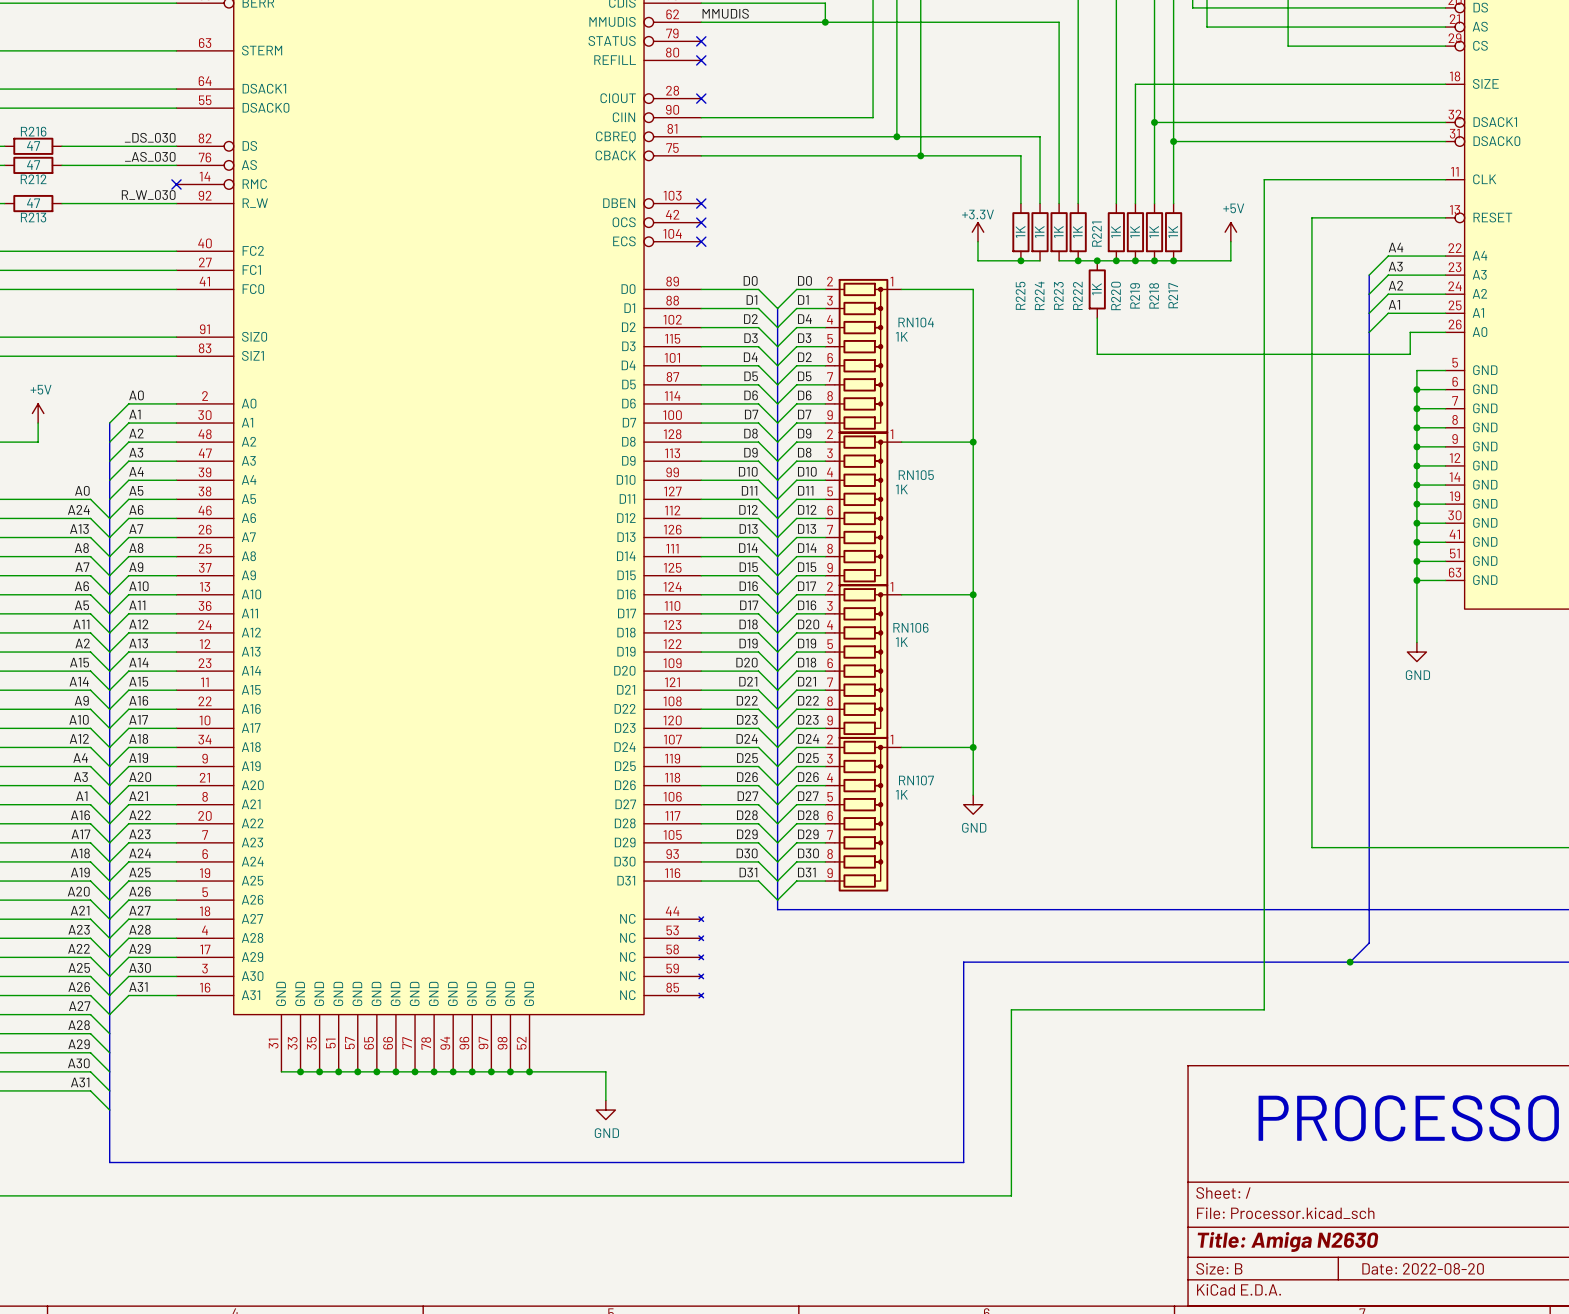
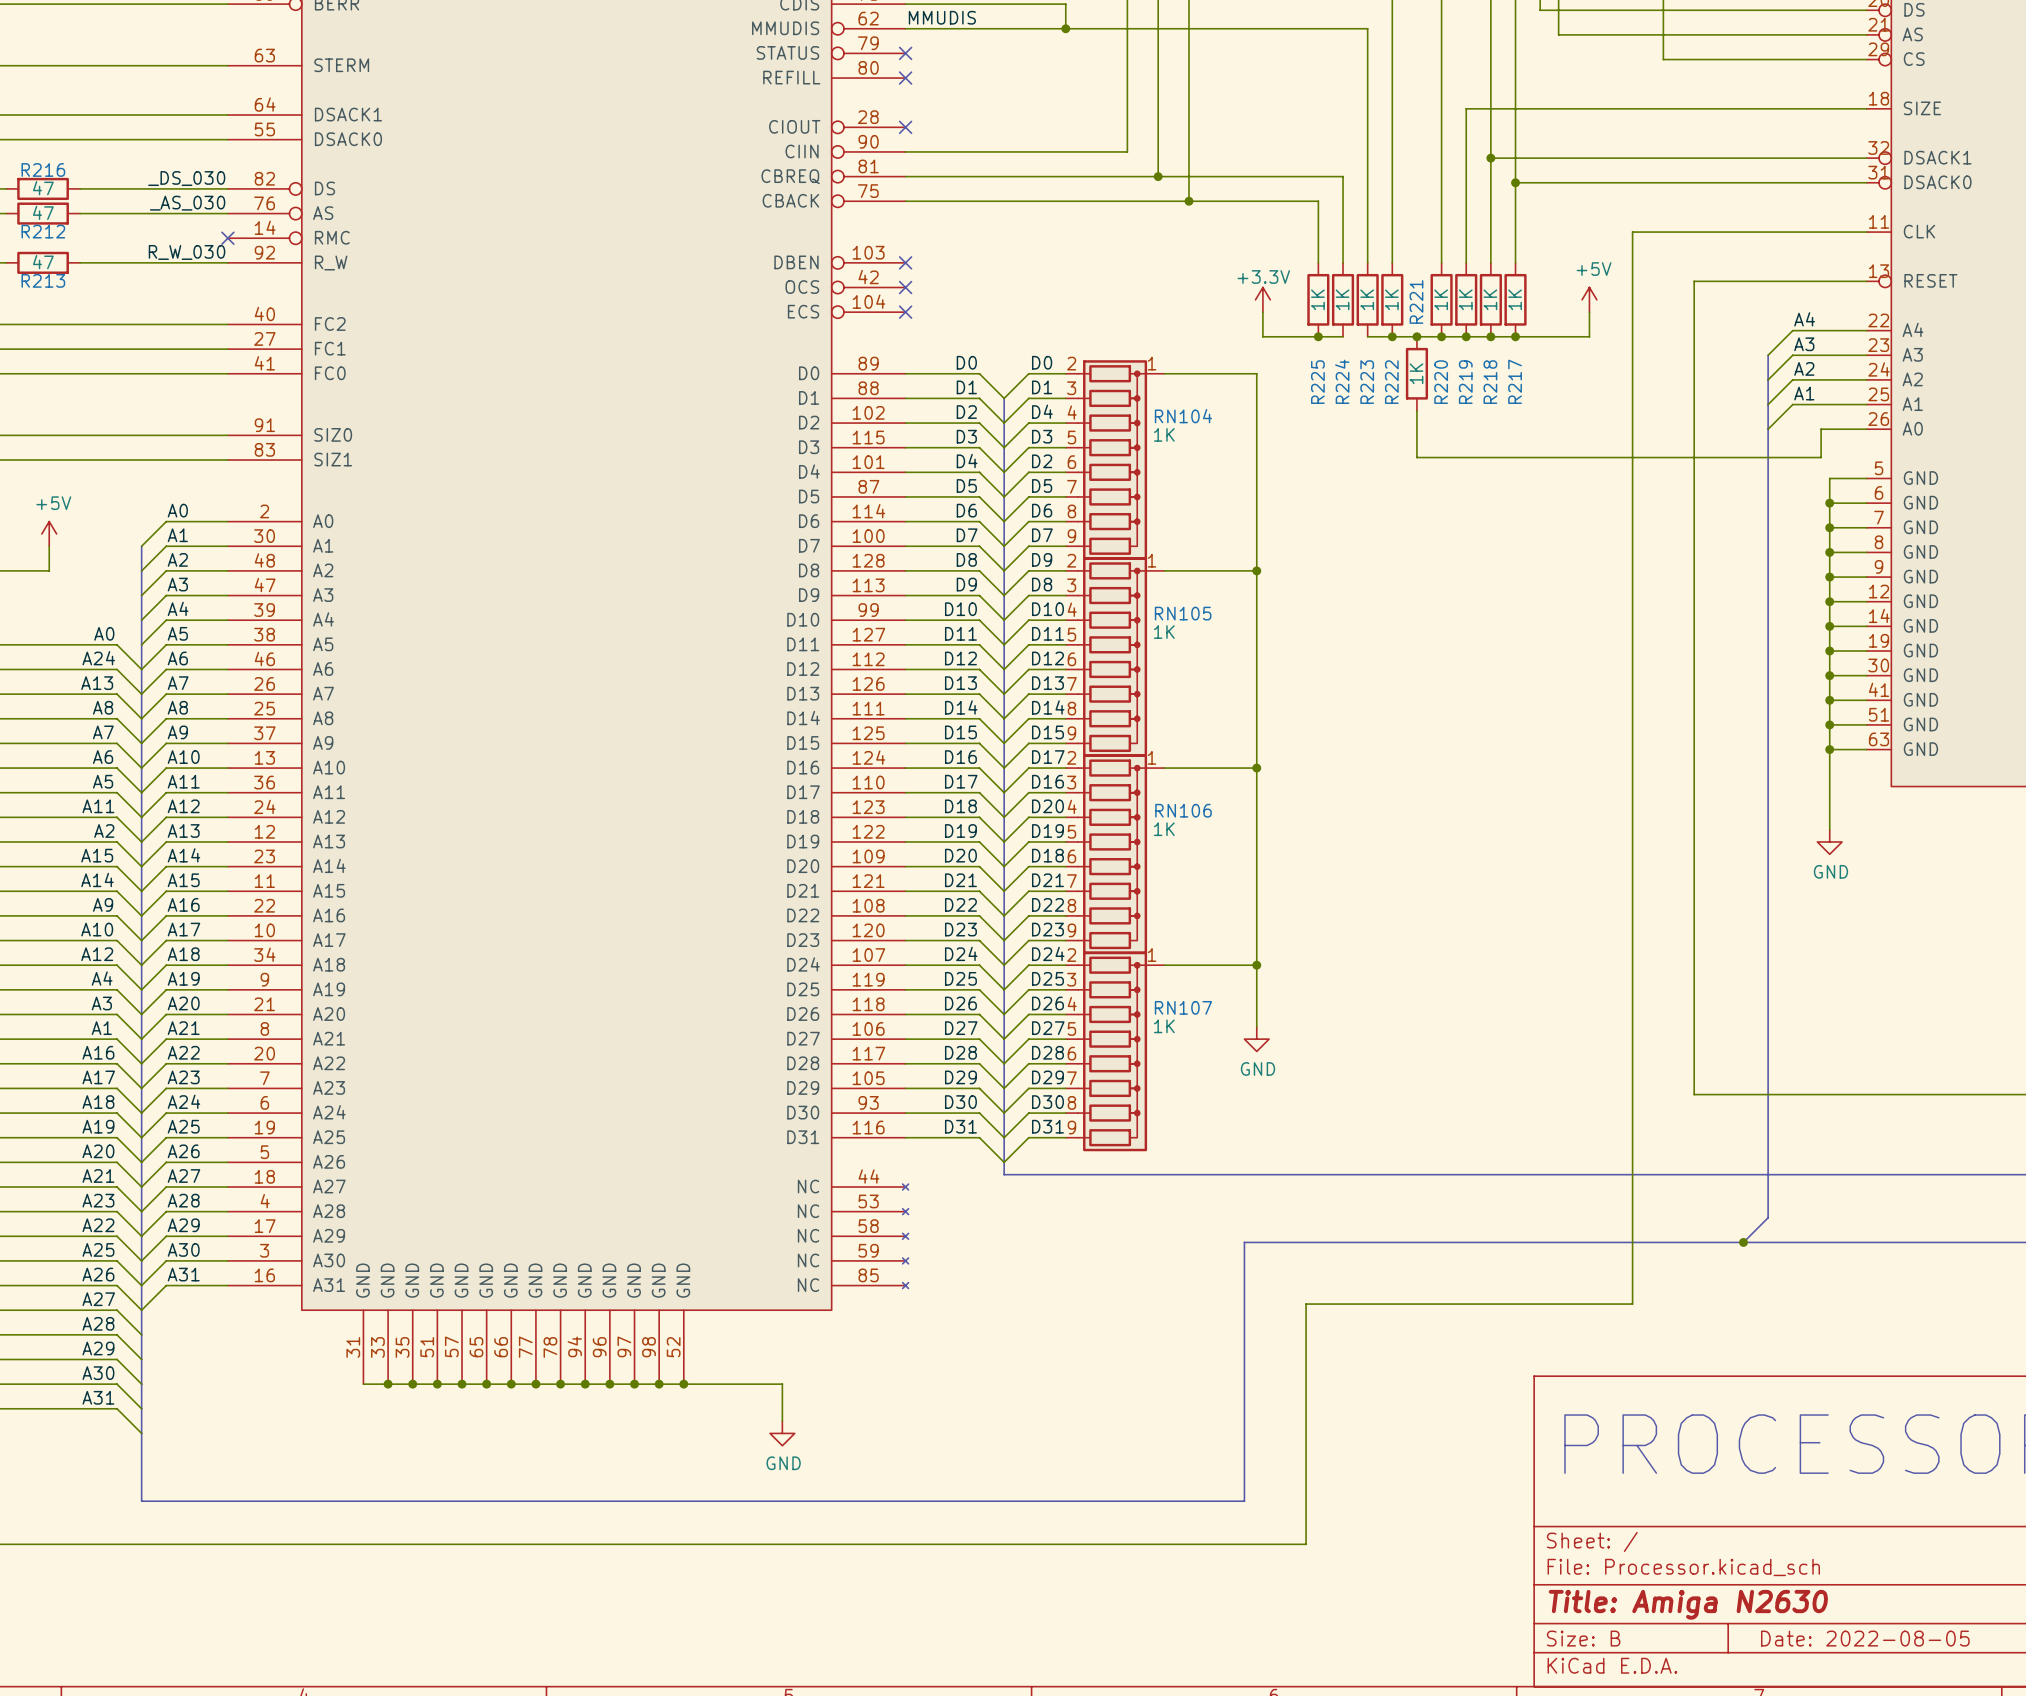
title block: Date: 2022-08-20 (1423, 1268) -> Date: 2022-08-05 (1865, 1638)

